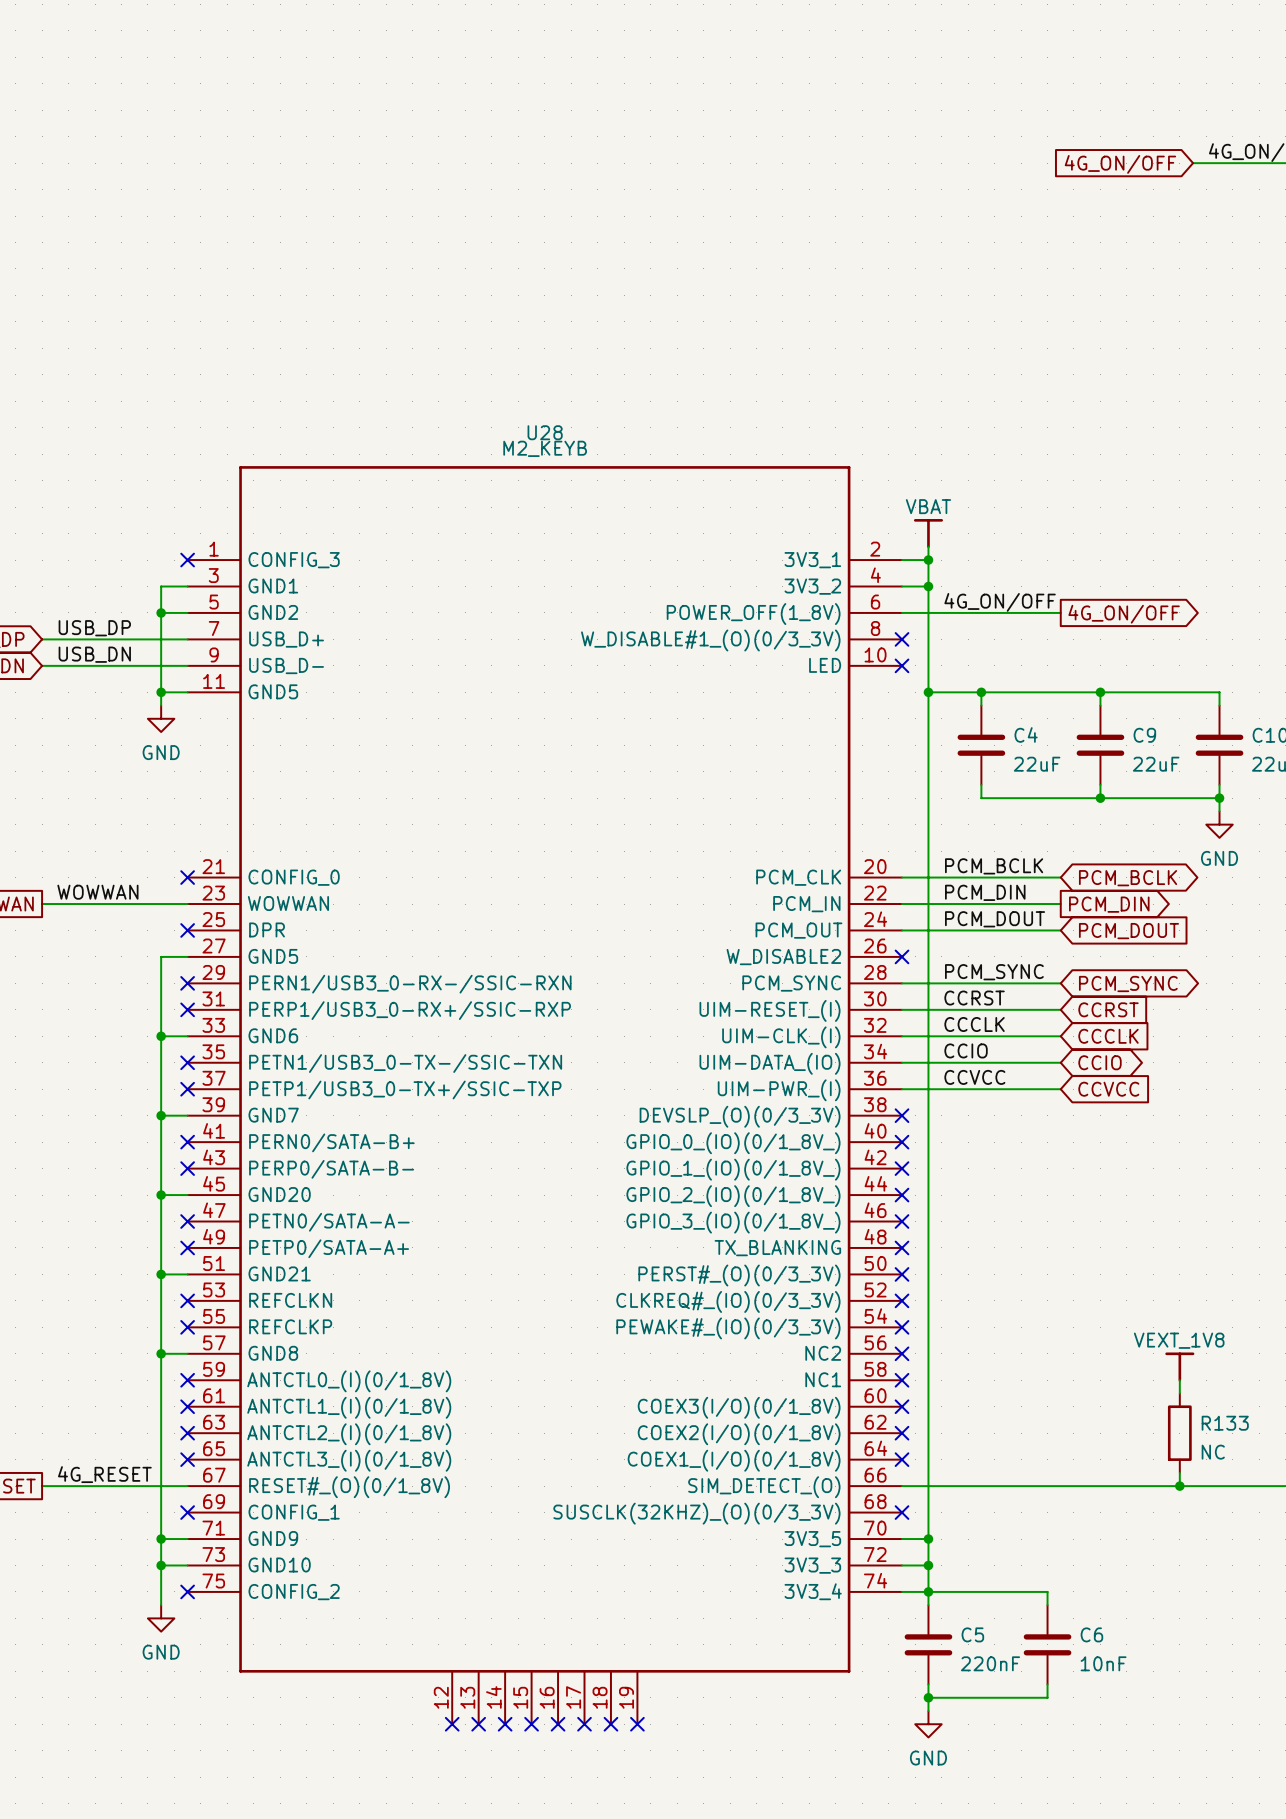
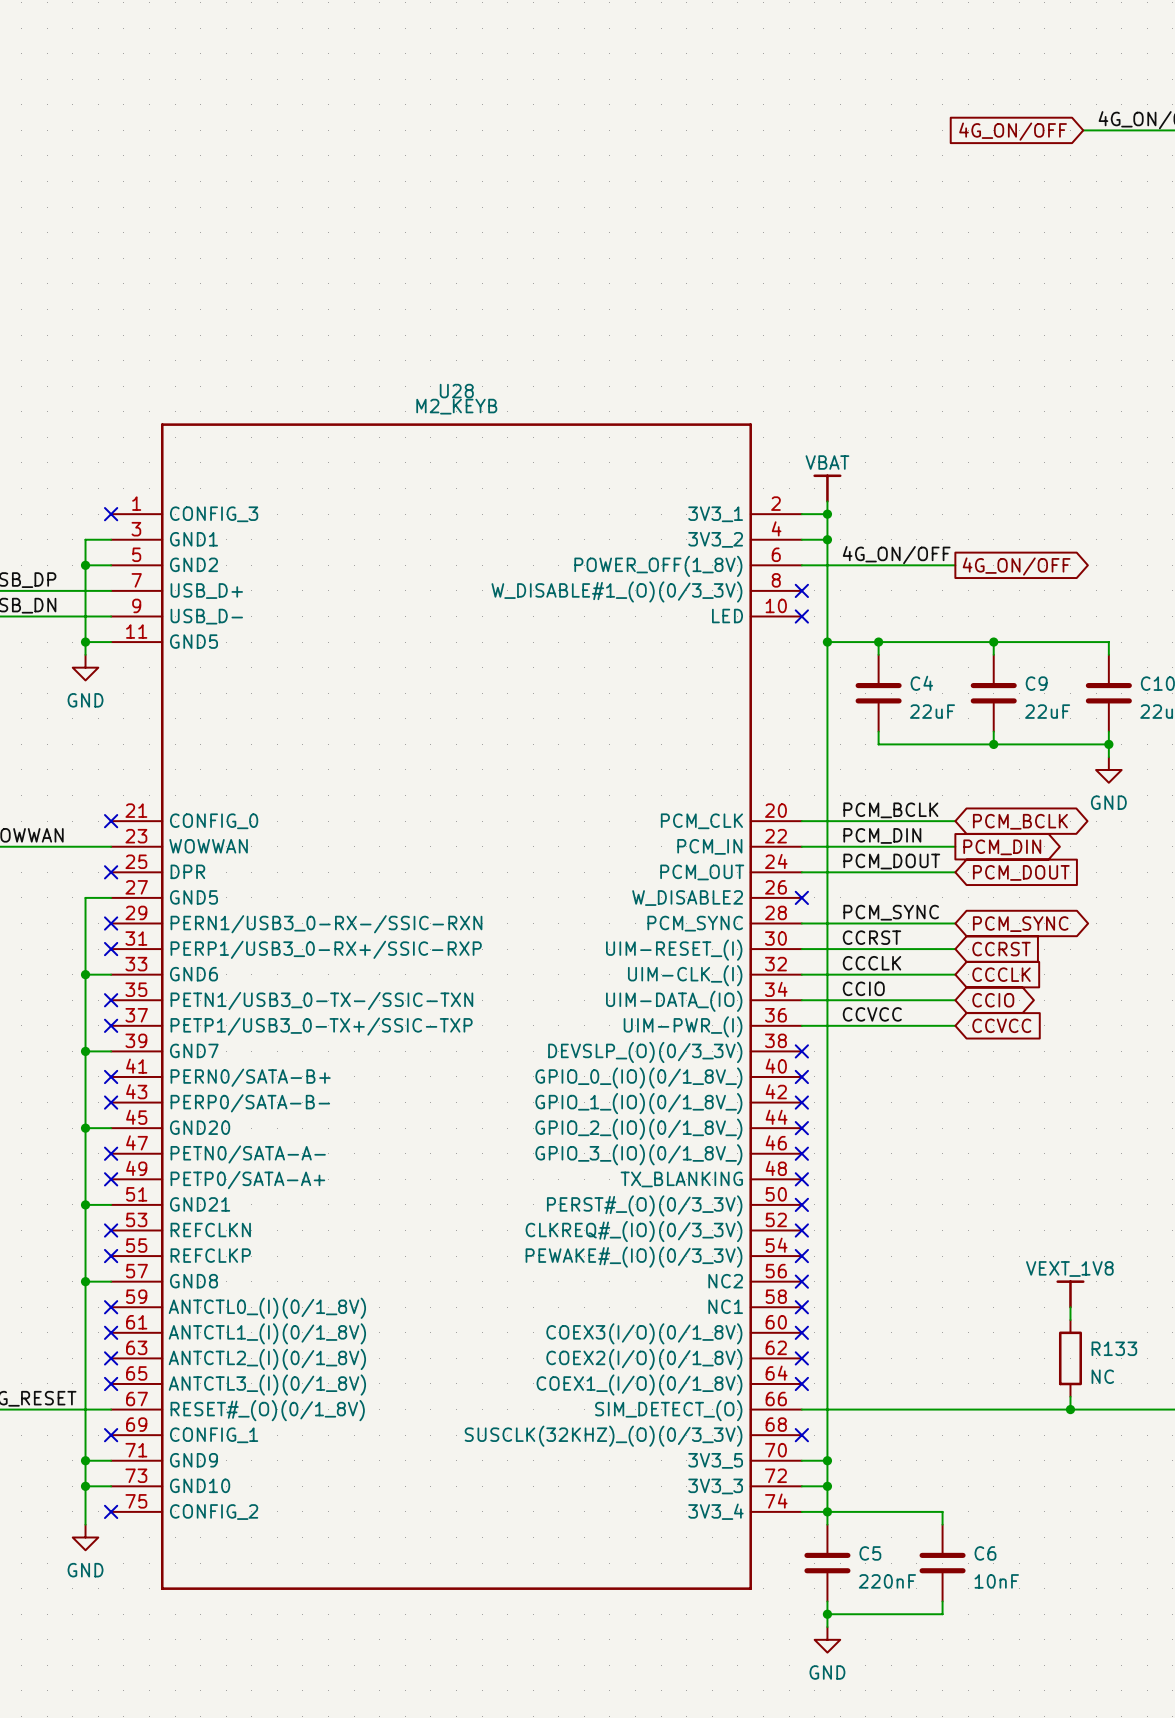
U28 symbol: [187, 466, 903, 1725] -> [111, 423, 802, 1590]
no-connect mark: (452, 1724) -> none
no-connect mark: (478, 1724) -> none
no-connect mark: (505, 1724) -> none
no-connect mark: (531, 1724) -> none
no-connect mark: (558, 1724) -> none
no-connect mark: (584, 1724) -> none
no-connect mark: (610, 1724) -> none
no-connect mark: (637, 1724) -> none

